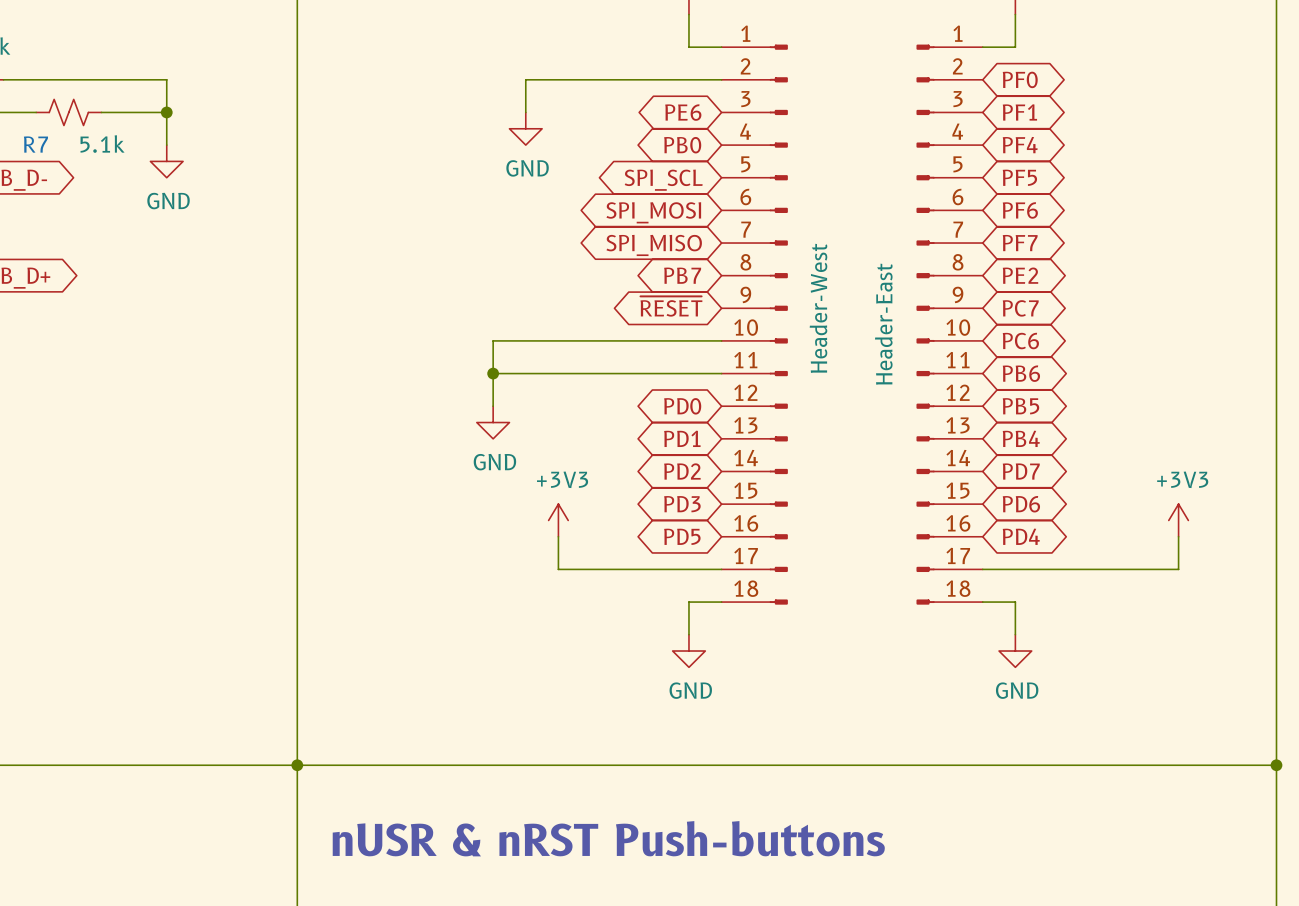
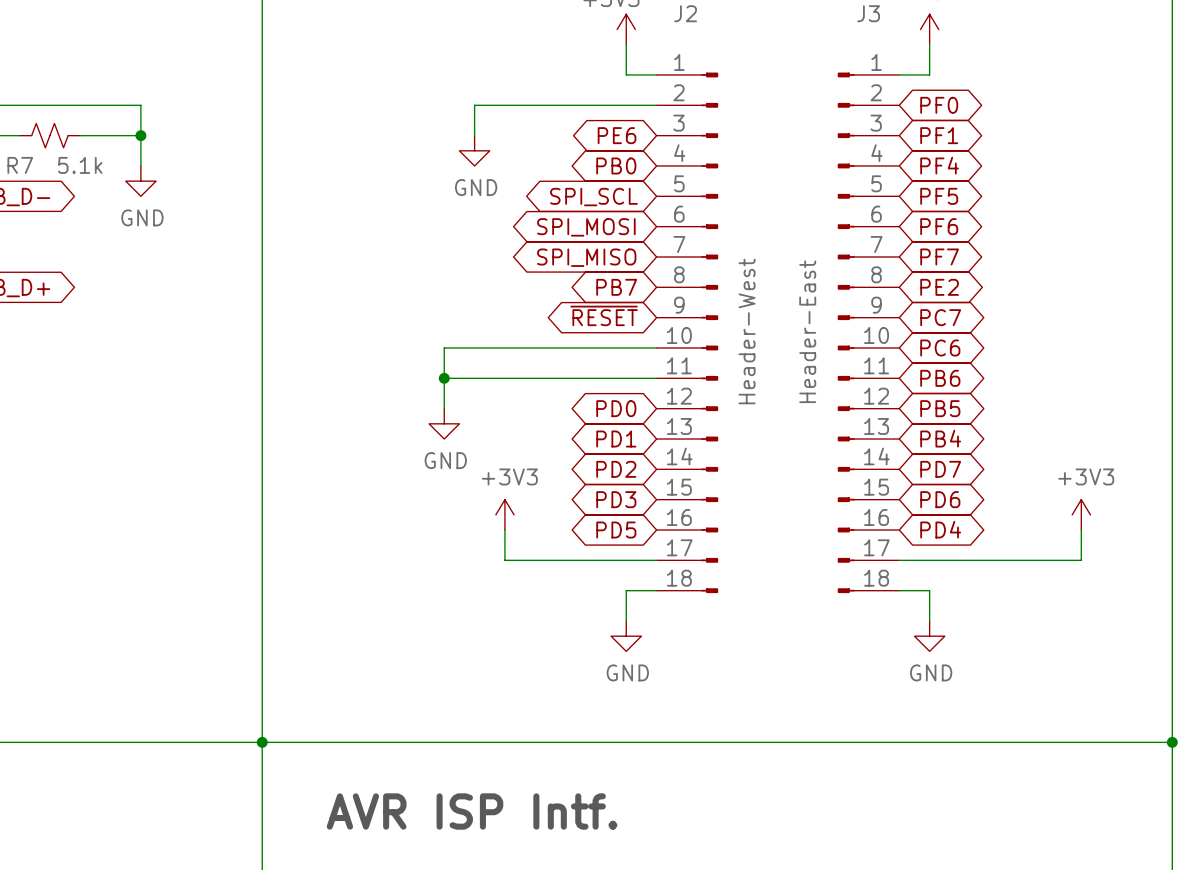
text: none -> AVR ISP Intf. (472, 811)
text: nUSR & nRST Push-buttons (608, 838) -> none

